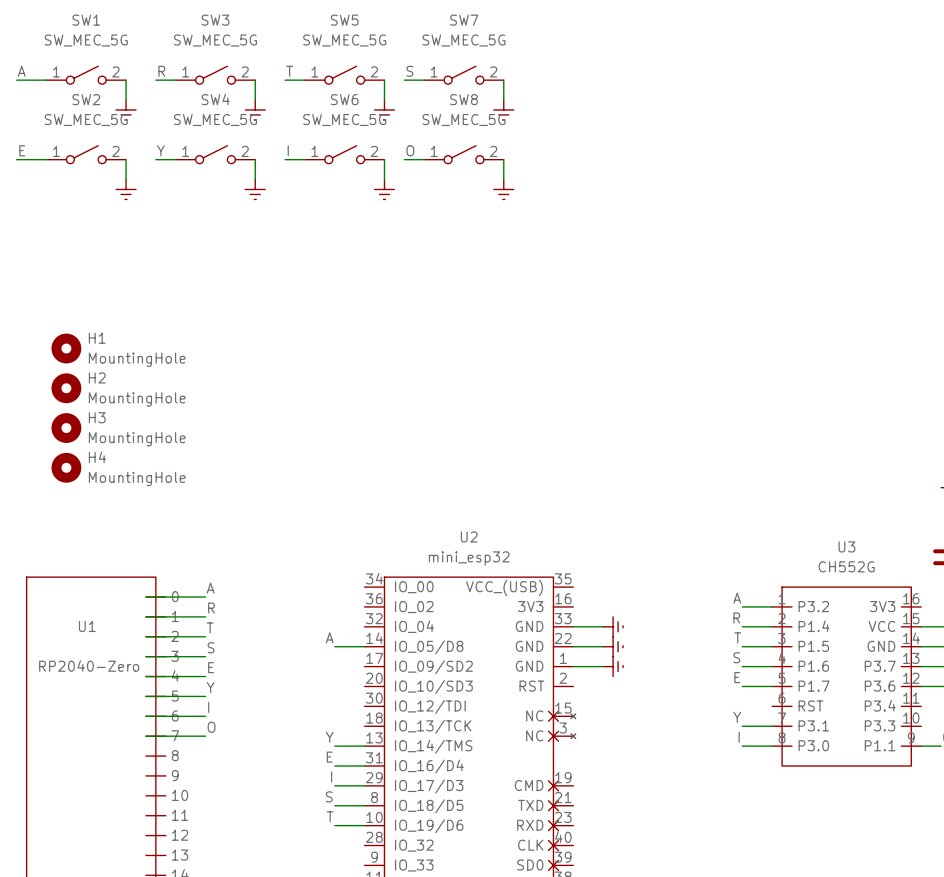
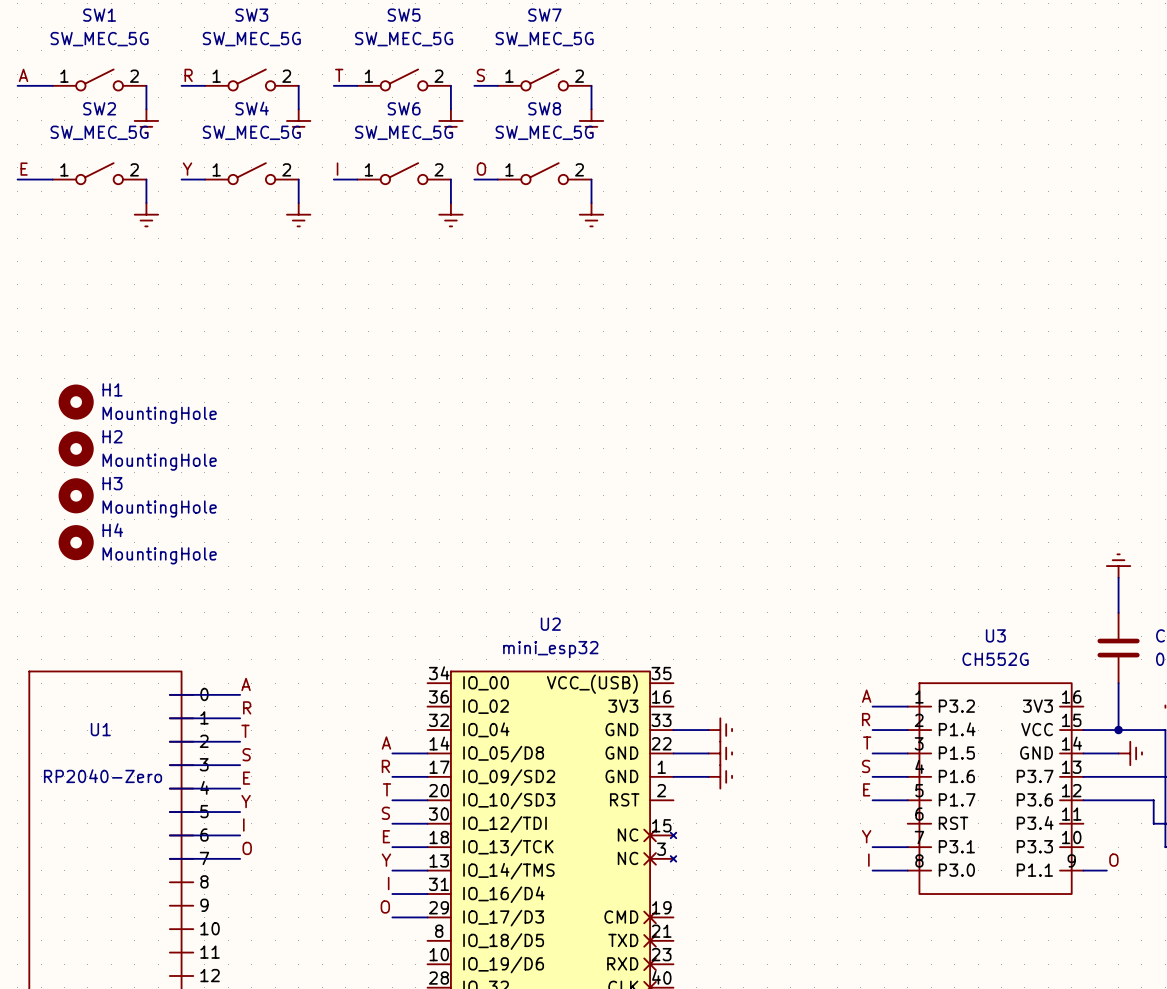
label: none -> R (385, 766)
wire: none -> (392, 776) (427, 776)
wire: none -> (392, 800) (427, 800)
label: none -> E (386, 836)
label: E (329, 757) -> I (388, 883)
label: I (331, 777) -> O (385, 906)
label position: S (329, 796) -> S (385, 813)
wire: (334, 805) (364, 805) -> (392, 847) (427, 847)
label position: T (330, 816) -> T (387, 789)
wire: (334, 825) (364, 825) -> (392, 823) (427, 823)

